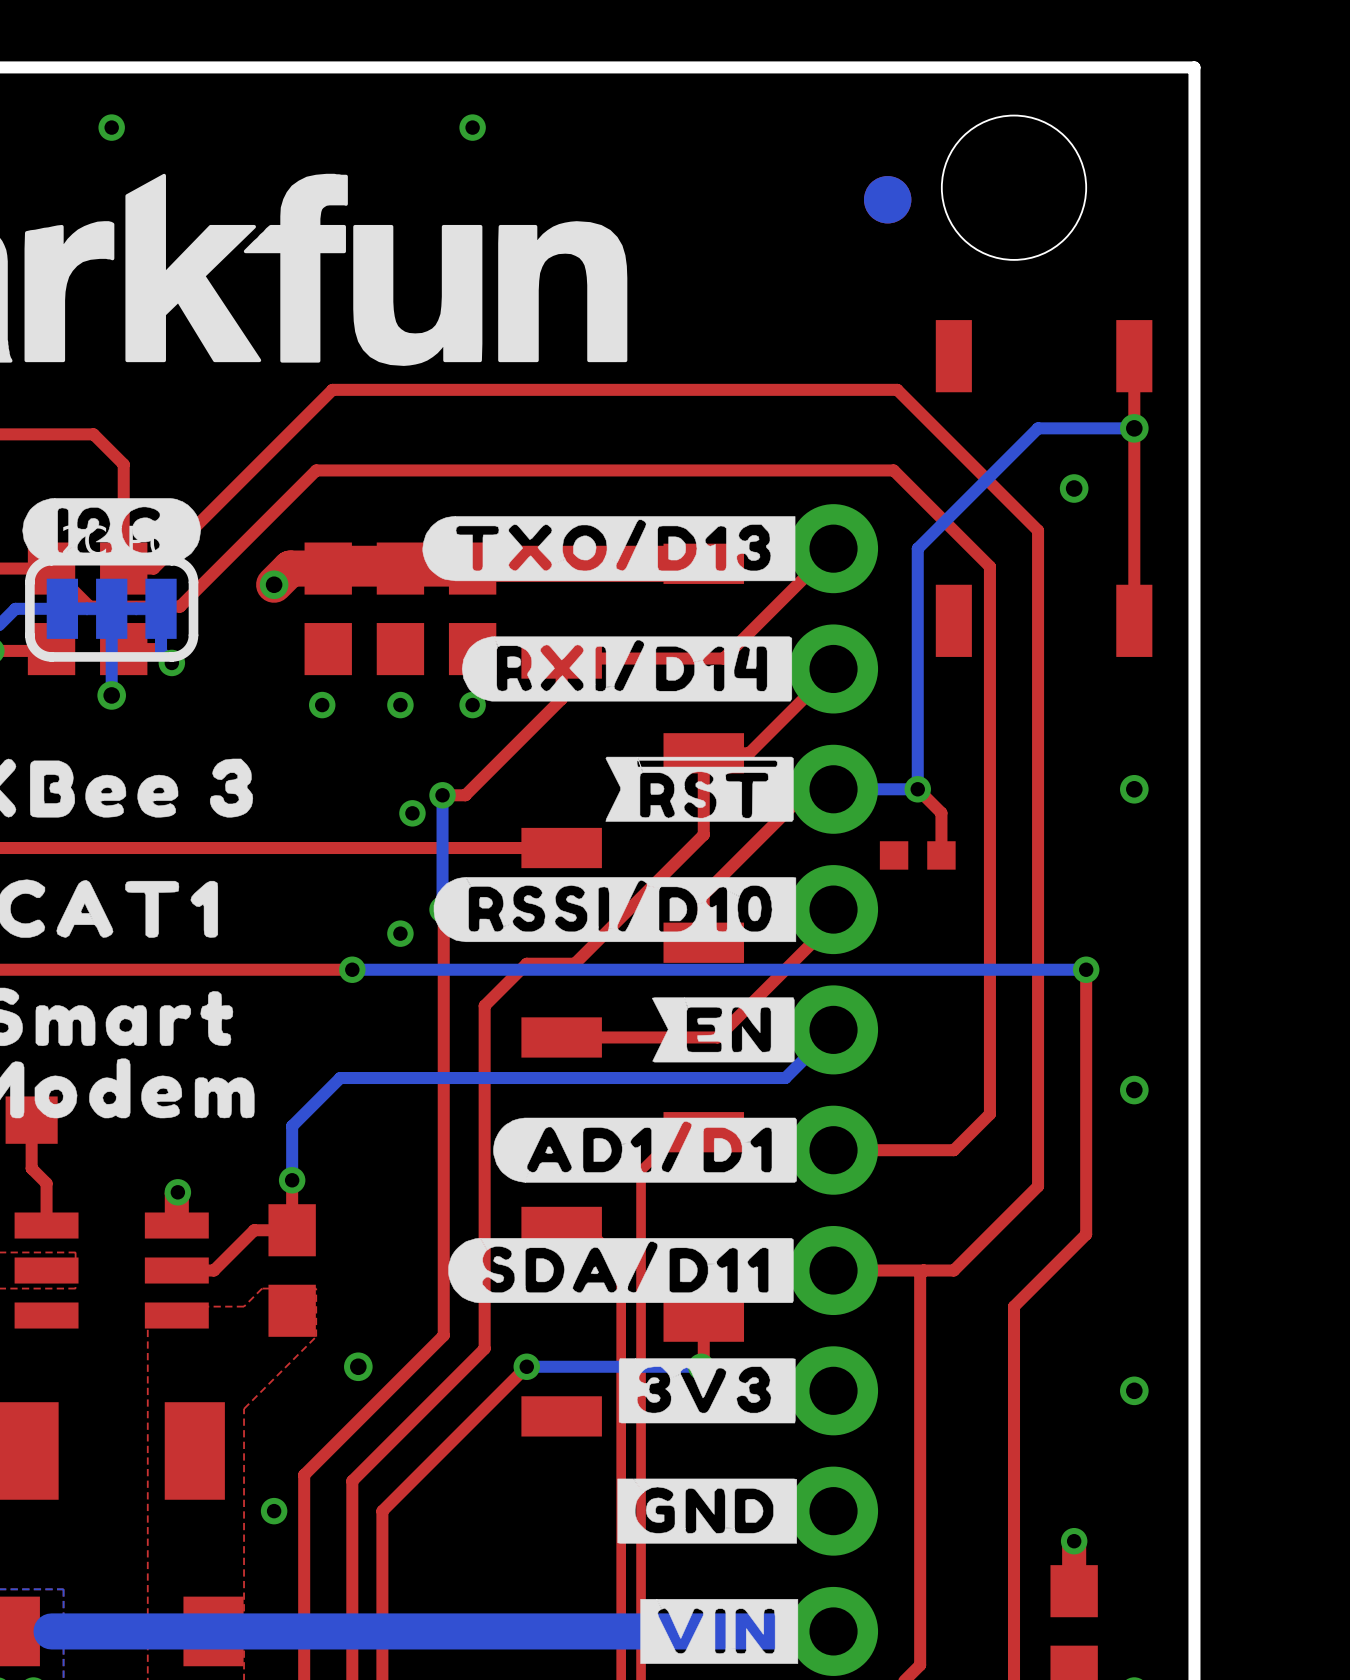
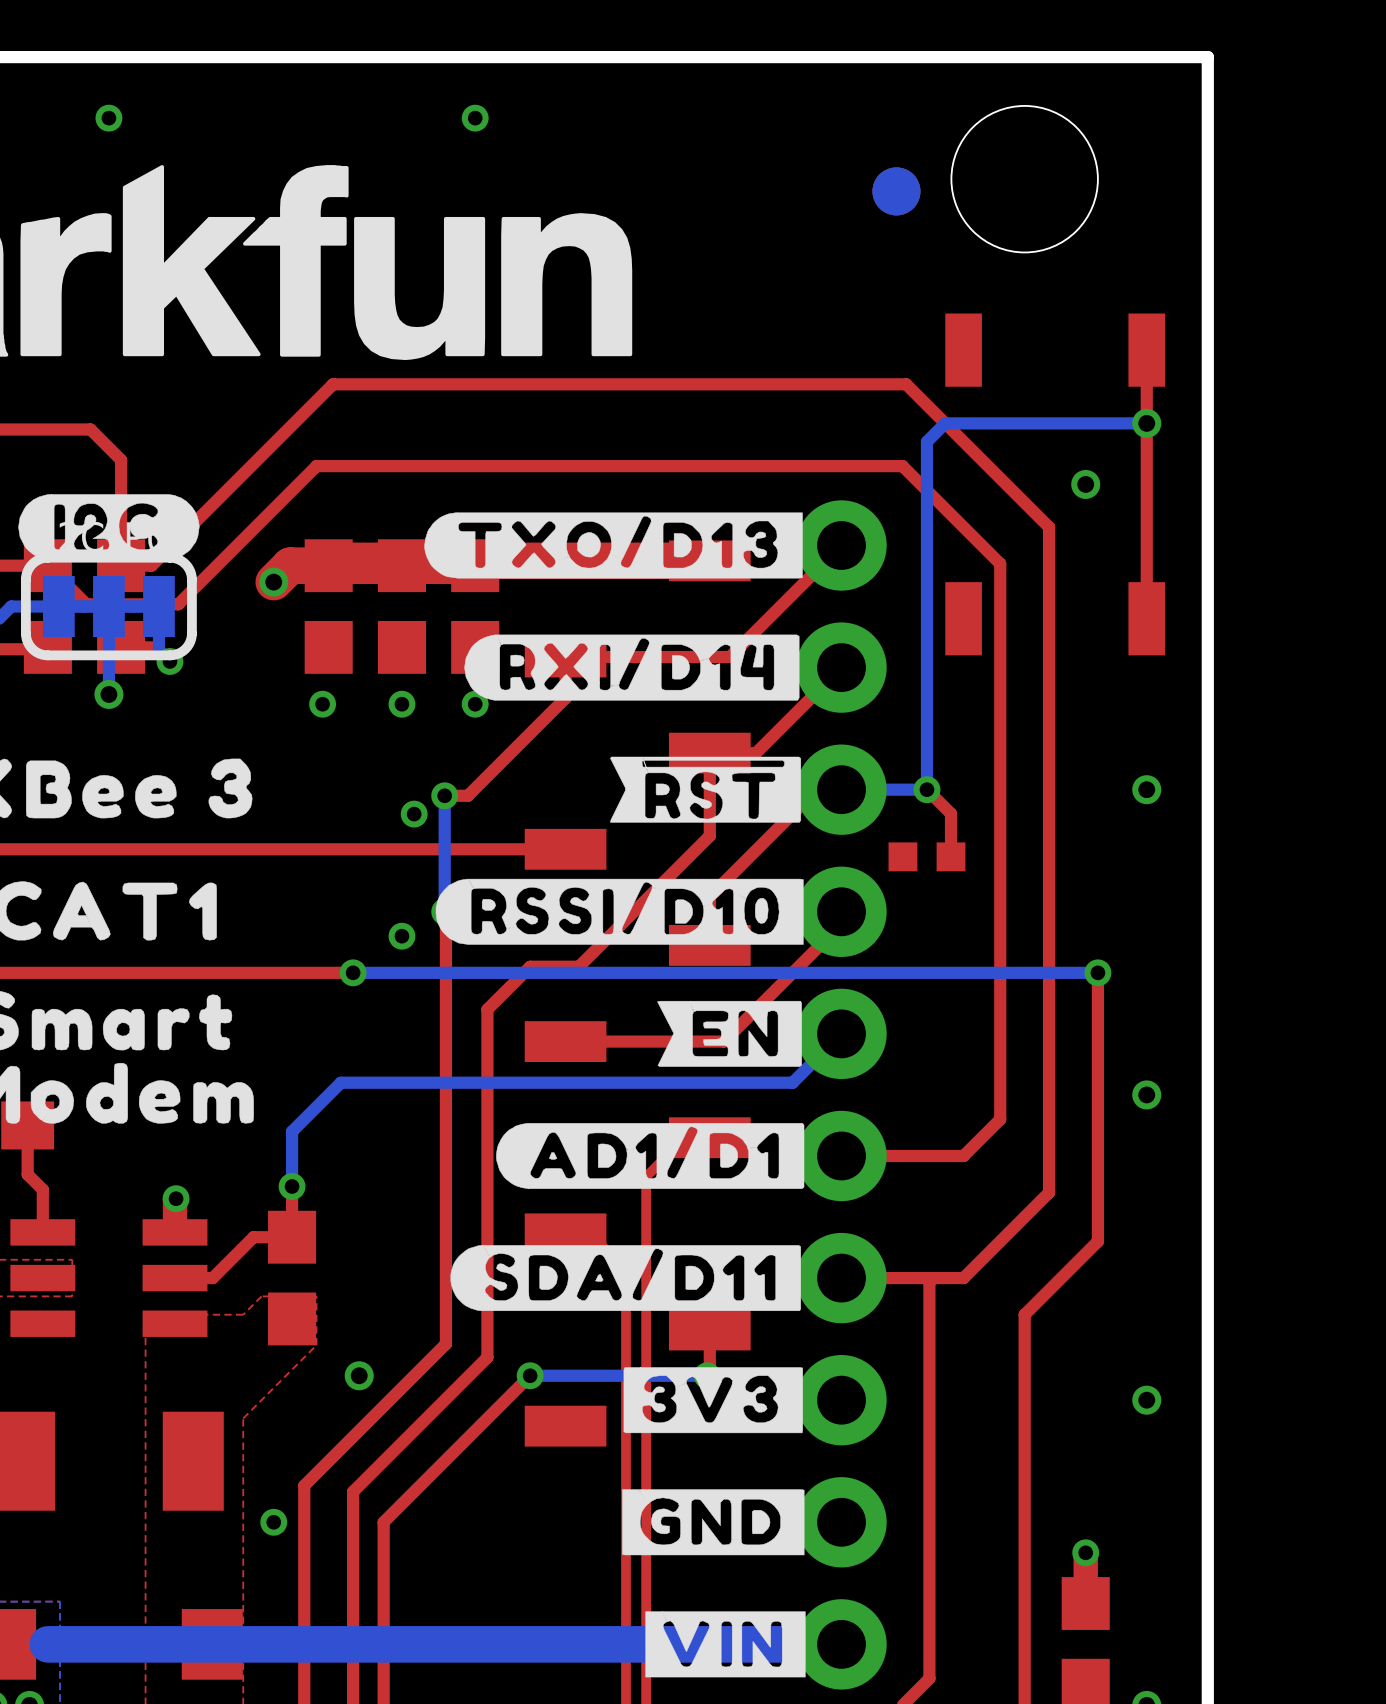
bottom track: (1038, 428) (917, 548) -> (1049, 423) (945, 423) (926, 441) (926, 545)

